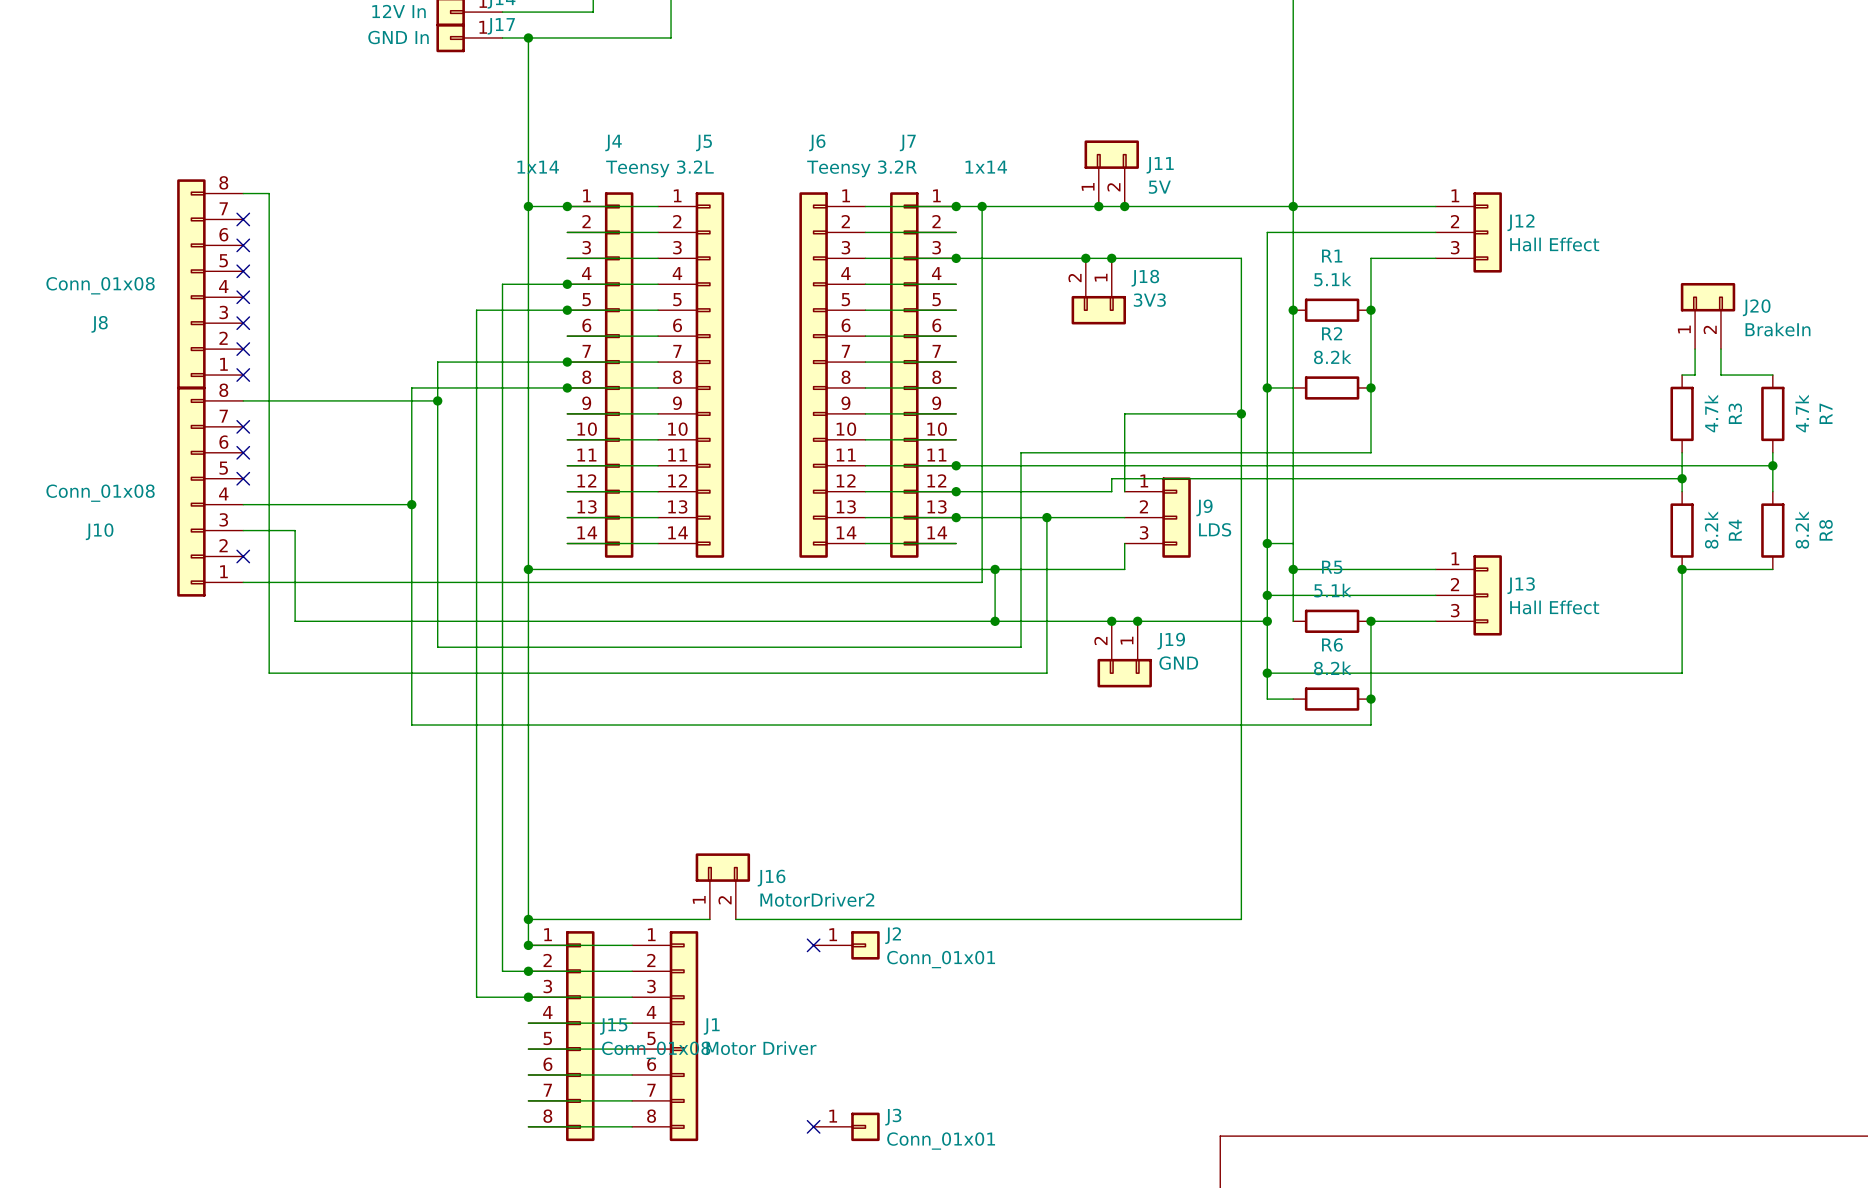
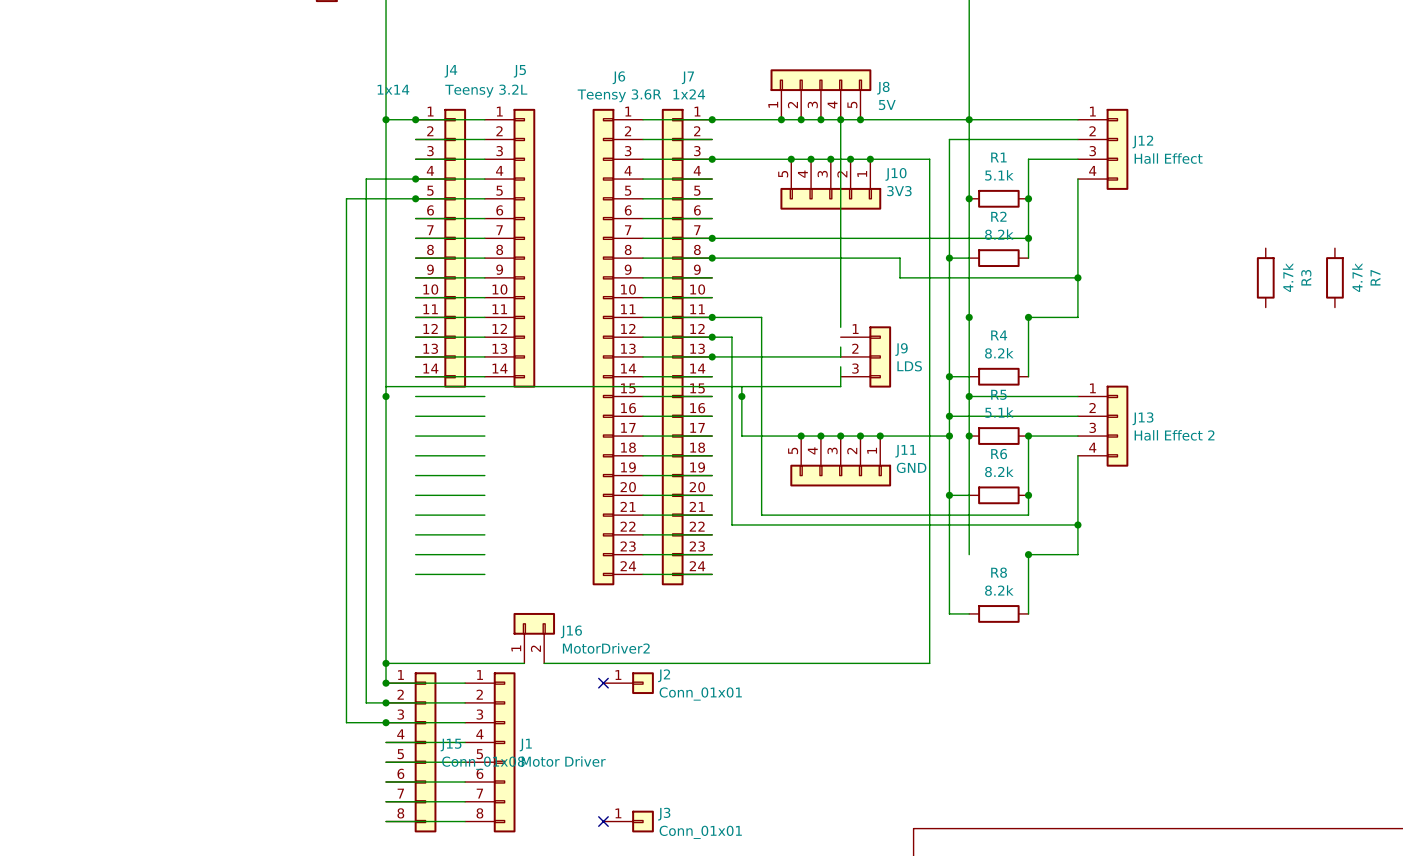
J11 symbol: [1084, 140, 1139, 207] -> [790, 436, 892, 487]
J6 name position: J6 (817, 142) -> J6 (618, 77)
J7 name position: J7 (907, 142) -> J7 (687, 77)
J11 name position: J11 (1160, 165) -> J11 (905, 451)
J7 value: 1x14 (986, 167) -> 1x24 (689, 94)
J6 value: Teensy 3.2R (861, 168) -> Teensy 3.6R (619, 95)
J8 symbol: [177, 179, 244, 390] -> [770, 69, 872, 120]
J11 value: 5V (1159, 187) -> GND (911, 467)
J6 symbol: [799, 192, 866, 558] -> [592, 108, 644, 586]
J7 symbol: [890, 192, 957, 558] -> [661, 108, 713, 586]
J12 symbol: [1435, 192, 1502, 273] -> [1077, 108, 1129, 190]
wire: (243, 193) (269, 193) (269, 673) (567, 673) -> none
wire: (982, 206) (982, 491) (1111, 491) (1111, 478) (1682, 478) -> none
junction: (982, 206) -> none
junction: none -> (781, 119)
junction: none -> (801, 119)
wire: none -> (840, 119) (840, 277)
junction: none -> (860, 119)
no-connect mark: (243, 219) -> none
no-connect mark: (243, 245) -> none
junction: none -> (791, 159)
junction: none -> (850, 159)
junction: none -> (870, 159)
no-connect mark: (243, 271) -> none
J8 value: Conn_01x08 (100, 285) -> 5V (887, 105)
J18: 3V3 (1098, 291) -> none
no-connect mark: (243, 297) -> none
J20: BrakeIn (1708, 316) -> none
no-connect mark: (243, 323) -> none
J8 name position: J8 (99, 324) -> J8 (883, 88)
no-connect mark: (243, 349) -> none
wire: (1695, 349) (1695, 375) (1682, 375) -> none
wire: (1720, 349) (1720, 375) (1772, 375) -> none
wire: (567, 362) (437, 362) (437, 647) (567, 647) -> none
junction: (567, 362) -> none
wire: none -> (712, 238) (1028, 238)
junction: none -> (712, 238)
no-connect mark: (243, 375) -> none
J10 symbol: [177, 386, 244, 597] -> [780, 159, 882, 210]
wire: (567, 387) (411, 387) (411, 725) (567, 725) -> none
junction: (567, 387) -> none
junction: none -> (712, 258)
wire: (1370, 387) (1370, 452) (1021, 452) (1021, 465) (1370, 465) -> (1028, 376) (1028, 317)
junction position: (1370, 387) -> (1028, 238)
wire: (243, 400) (437, 400) -> none
junction: (437, 400) -> none
wire: (1124, 413) (1202, 413) -> (712, 258) (900, 258) (900, 277)
wire: none -> (929, 277) (1077, 277)
junction: (1241, 413) -> none
junction: none -> (1077, 277)
no-connect mark: (243, 426) -> none
no-connect mark: (243, 452) -> none
wire: (1682, 452) (1682, 491) -> none
wire: (1772, 452) (1772, 491) -> none
junction: none -> (969, 317)
junction: none -> (1028, 317)
wire: (1435, 465) (1772, 465) -> (1077, 317) (1077, 179)
junction: (1772, 465) -> none
no-connect mark: (243, 478) -> none
wire: (1124, 478) (1124, 491) -> (840, 347) (840, 356)
junction: (1682, 478) -> none
J10 value: Conn_01x08 (100, 493) -> 3V3 (899, 191)
wire: (243, 504) (411, 504) -> none
junction: (411, 504) -> none
wire: (1046, 517) (1046, 673) (956, 673) -> none
junction: (1046, 517) -> none
R4 value position: 8.2k (1711, 529) -> 8.2k (999, 353)
R8 value position: 8.2k (1802, 529) -> 8.2k (999, 590)
wire: (243, 530) (295, 530) (295, 621) (567, 621) -> none
wire: none -> (840, 366) (840, 376)
R4 rotation: 0° (1682, 530) -> 90° clockwise (998, 376)
R4 position: (1682, 530) -> (998, 376)
R4 name position: R4 (1735, 530) -> R4 (999, 335)
R8 rotation: 0° (1772, 530) -> 90° clockwise (998, 613)
R8 position: (1772, 530) -> (998, 613)
R8 name position: R8 (1826, 530) -> R8 (999, 572)
J10 name position: J10 (99, 531) -> J10 (896, 174)
J13 symbol: [1435, 555, 1502, 636] -> [1077, 385, 1129, 467]
no-connect mark: (243, 556) -> none
wire: none -> (741, 386) (741, 396)
wire: (1124, 556) (1124, 569) (956, 569) -> (840, 386) (386, 386)
wire: (528, 569) (567, 569) -> none
wire: (658, 569) (865, 569) -> none
junction: (1682, 569) -> none
wire: (1772, 569) (1682, 569) (1682, 673) (1267, 673) -> none
wire: (243, 582) (982, 582) -> (1077, 524) (731, 524) (731, 406)
wire: none -> (415, 416) (484, 416)
wire: none -> (643, 416) (712, 416)
J13 value: Hall Effect (1554, 607) -> Hall Effect 2 (1174, 435)
wire: (658, 621) (865, 621) -> none
wire: (956, 621) (995, 621) -> none
junction: (995, 621) -> none
junction: none -> (801, 436)
junction: none -> (820, 436)
junction: (1111, 621) -> none
junction: none -> (840, 436)
junction: (1137, 621) -> none
junction: none -> (860, 436)
junction: none -> (880, 436)
wire: none -> (969, 436) (969, 554)
junction: none -> (969, 436)
wire: (658, 647) (865, 647) -> none
wire: (956, 647) (1021, 647) -> (761, 515) (761, 455)
wire: none -> (1077, 455) (1077, 554) (1028, 554) (1028, 613)
J19: GND (1124, 654) -> none
wire: (658, 673) (865, 673) -> none
junction position: (1267, 673) -> (949, 495)
wire: none -> (415, 495) (484, 495)
wire: none -> (643, 495) (712, 495)
wire: none -> (949, 495) (949, 613) (969, 613)
wire: (658, 725) (865, 725) -> none
wire: (956, 725) (1021, 725) -> none
junction: none -> (1077, 524)
wire: none -> (415, 534) (484, 534)
wire: none -> (643, 534) (712, 534)
wire: none -> (415, 554) (484, 554)
wire: none -> (643, 554) (712, 554)
junction: none -> (1028, 554)
wire: none -> (415, 574) (484, 574)
wire: none -> (643, 574) (712, 574)

